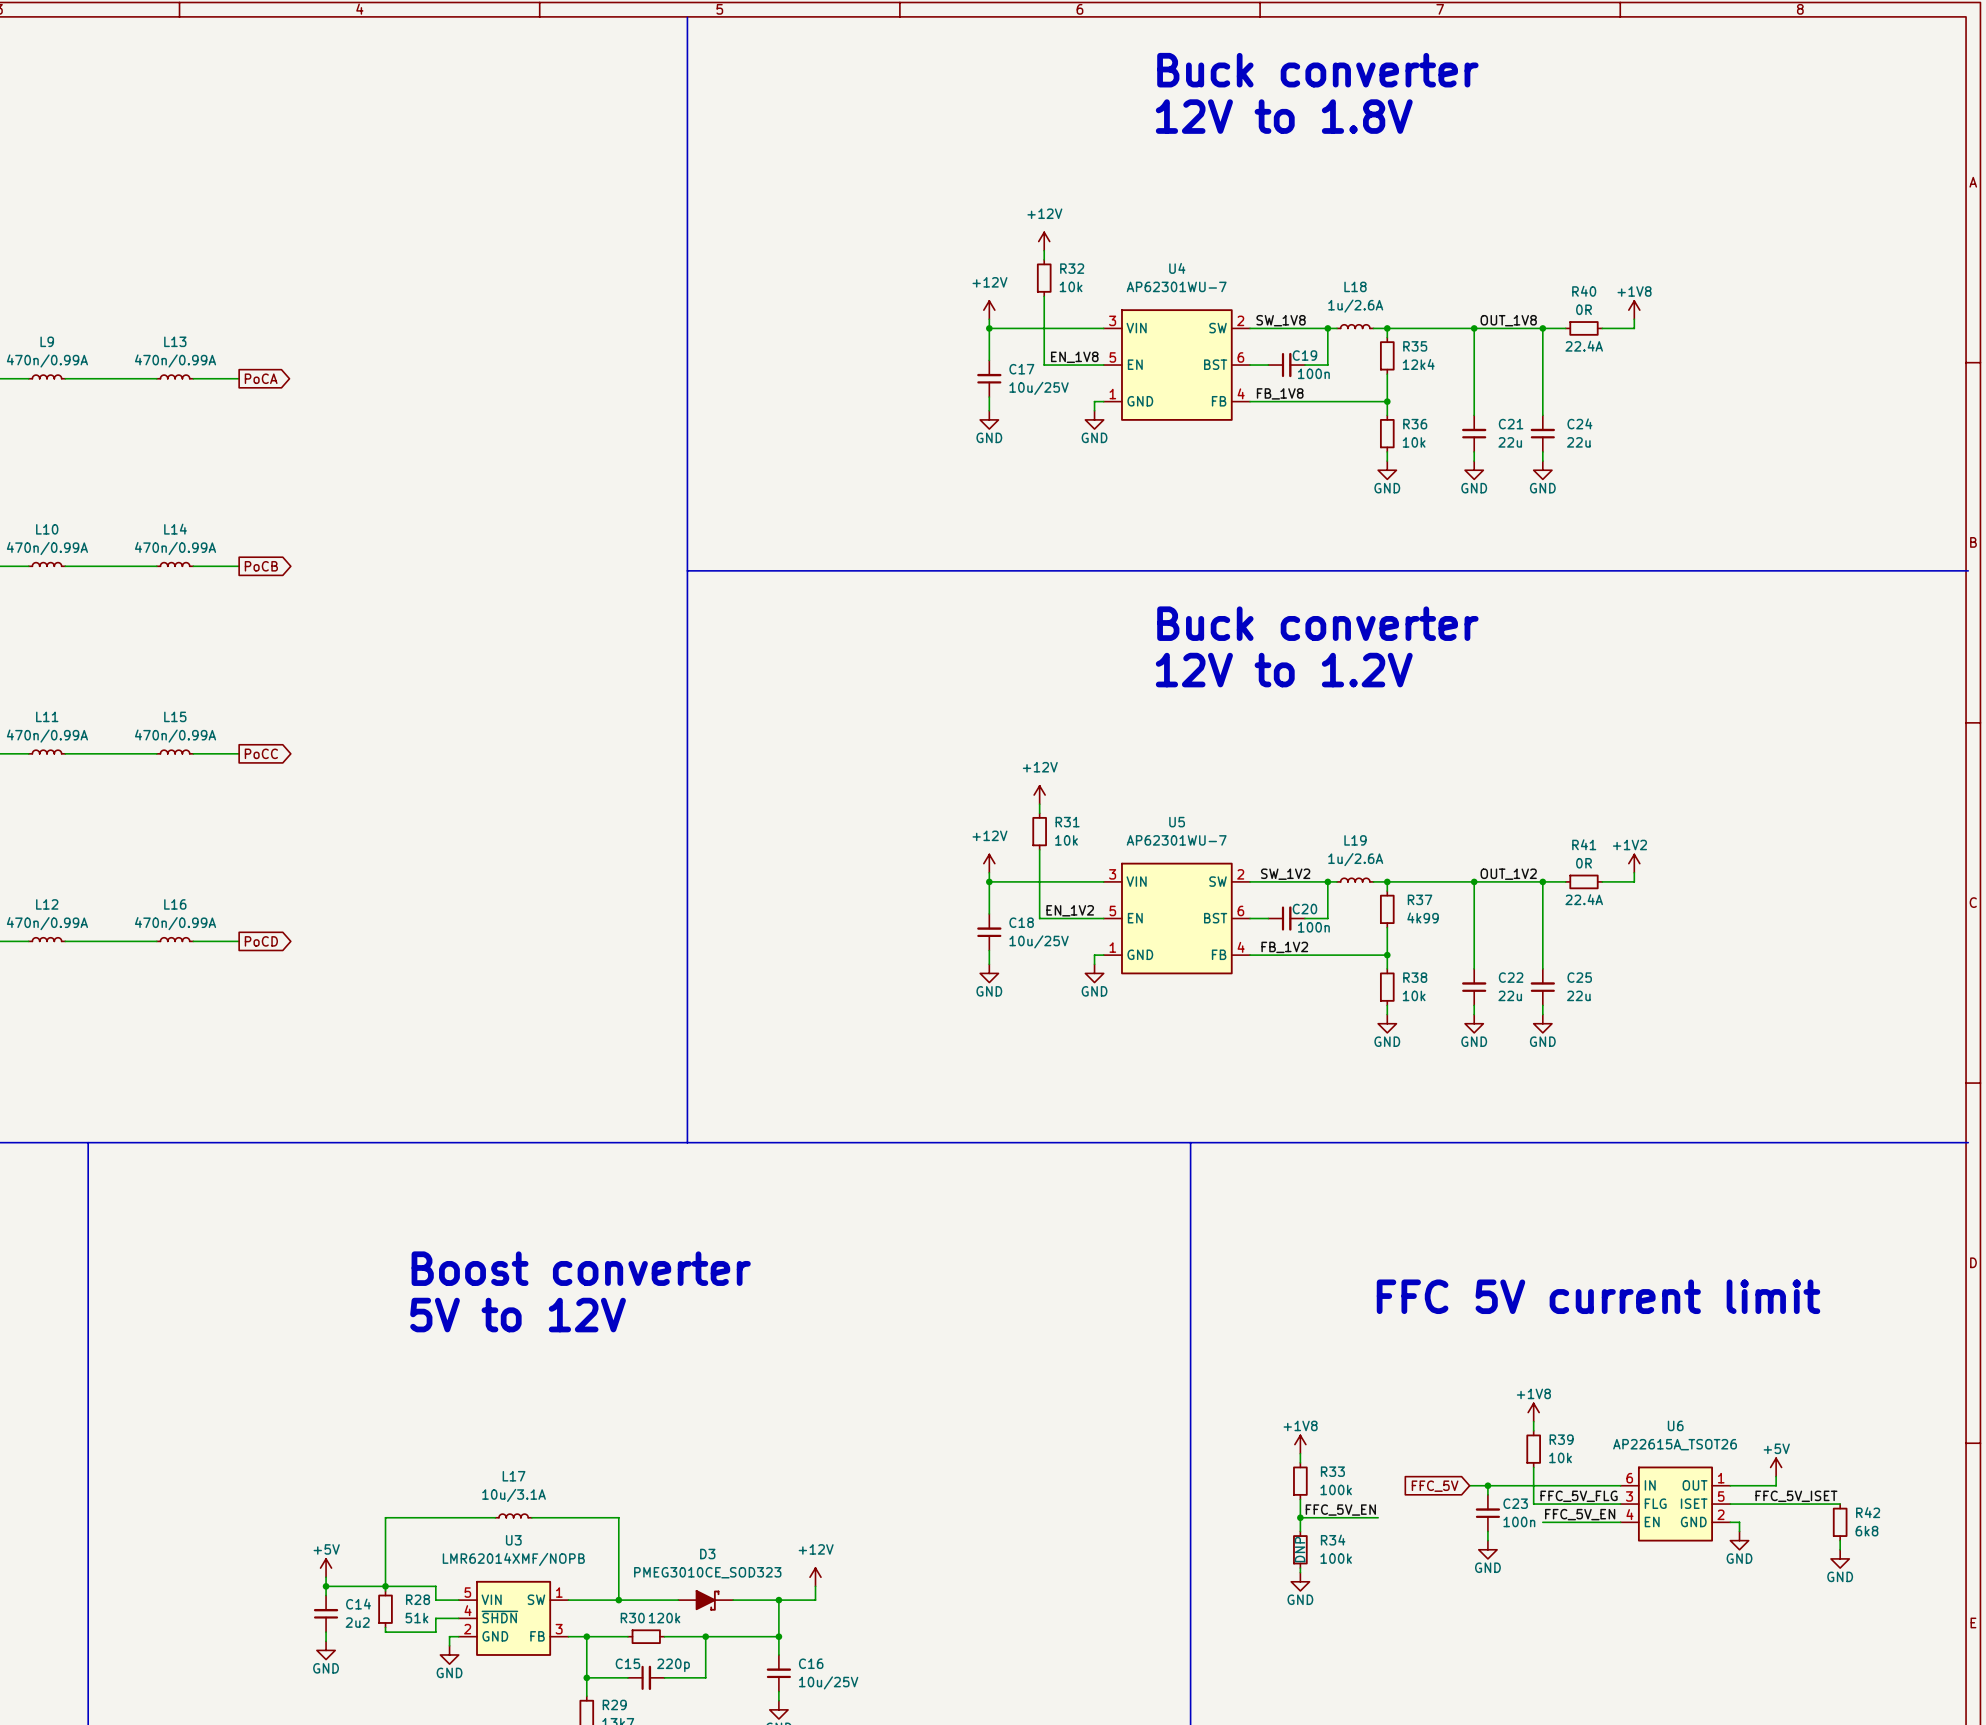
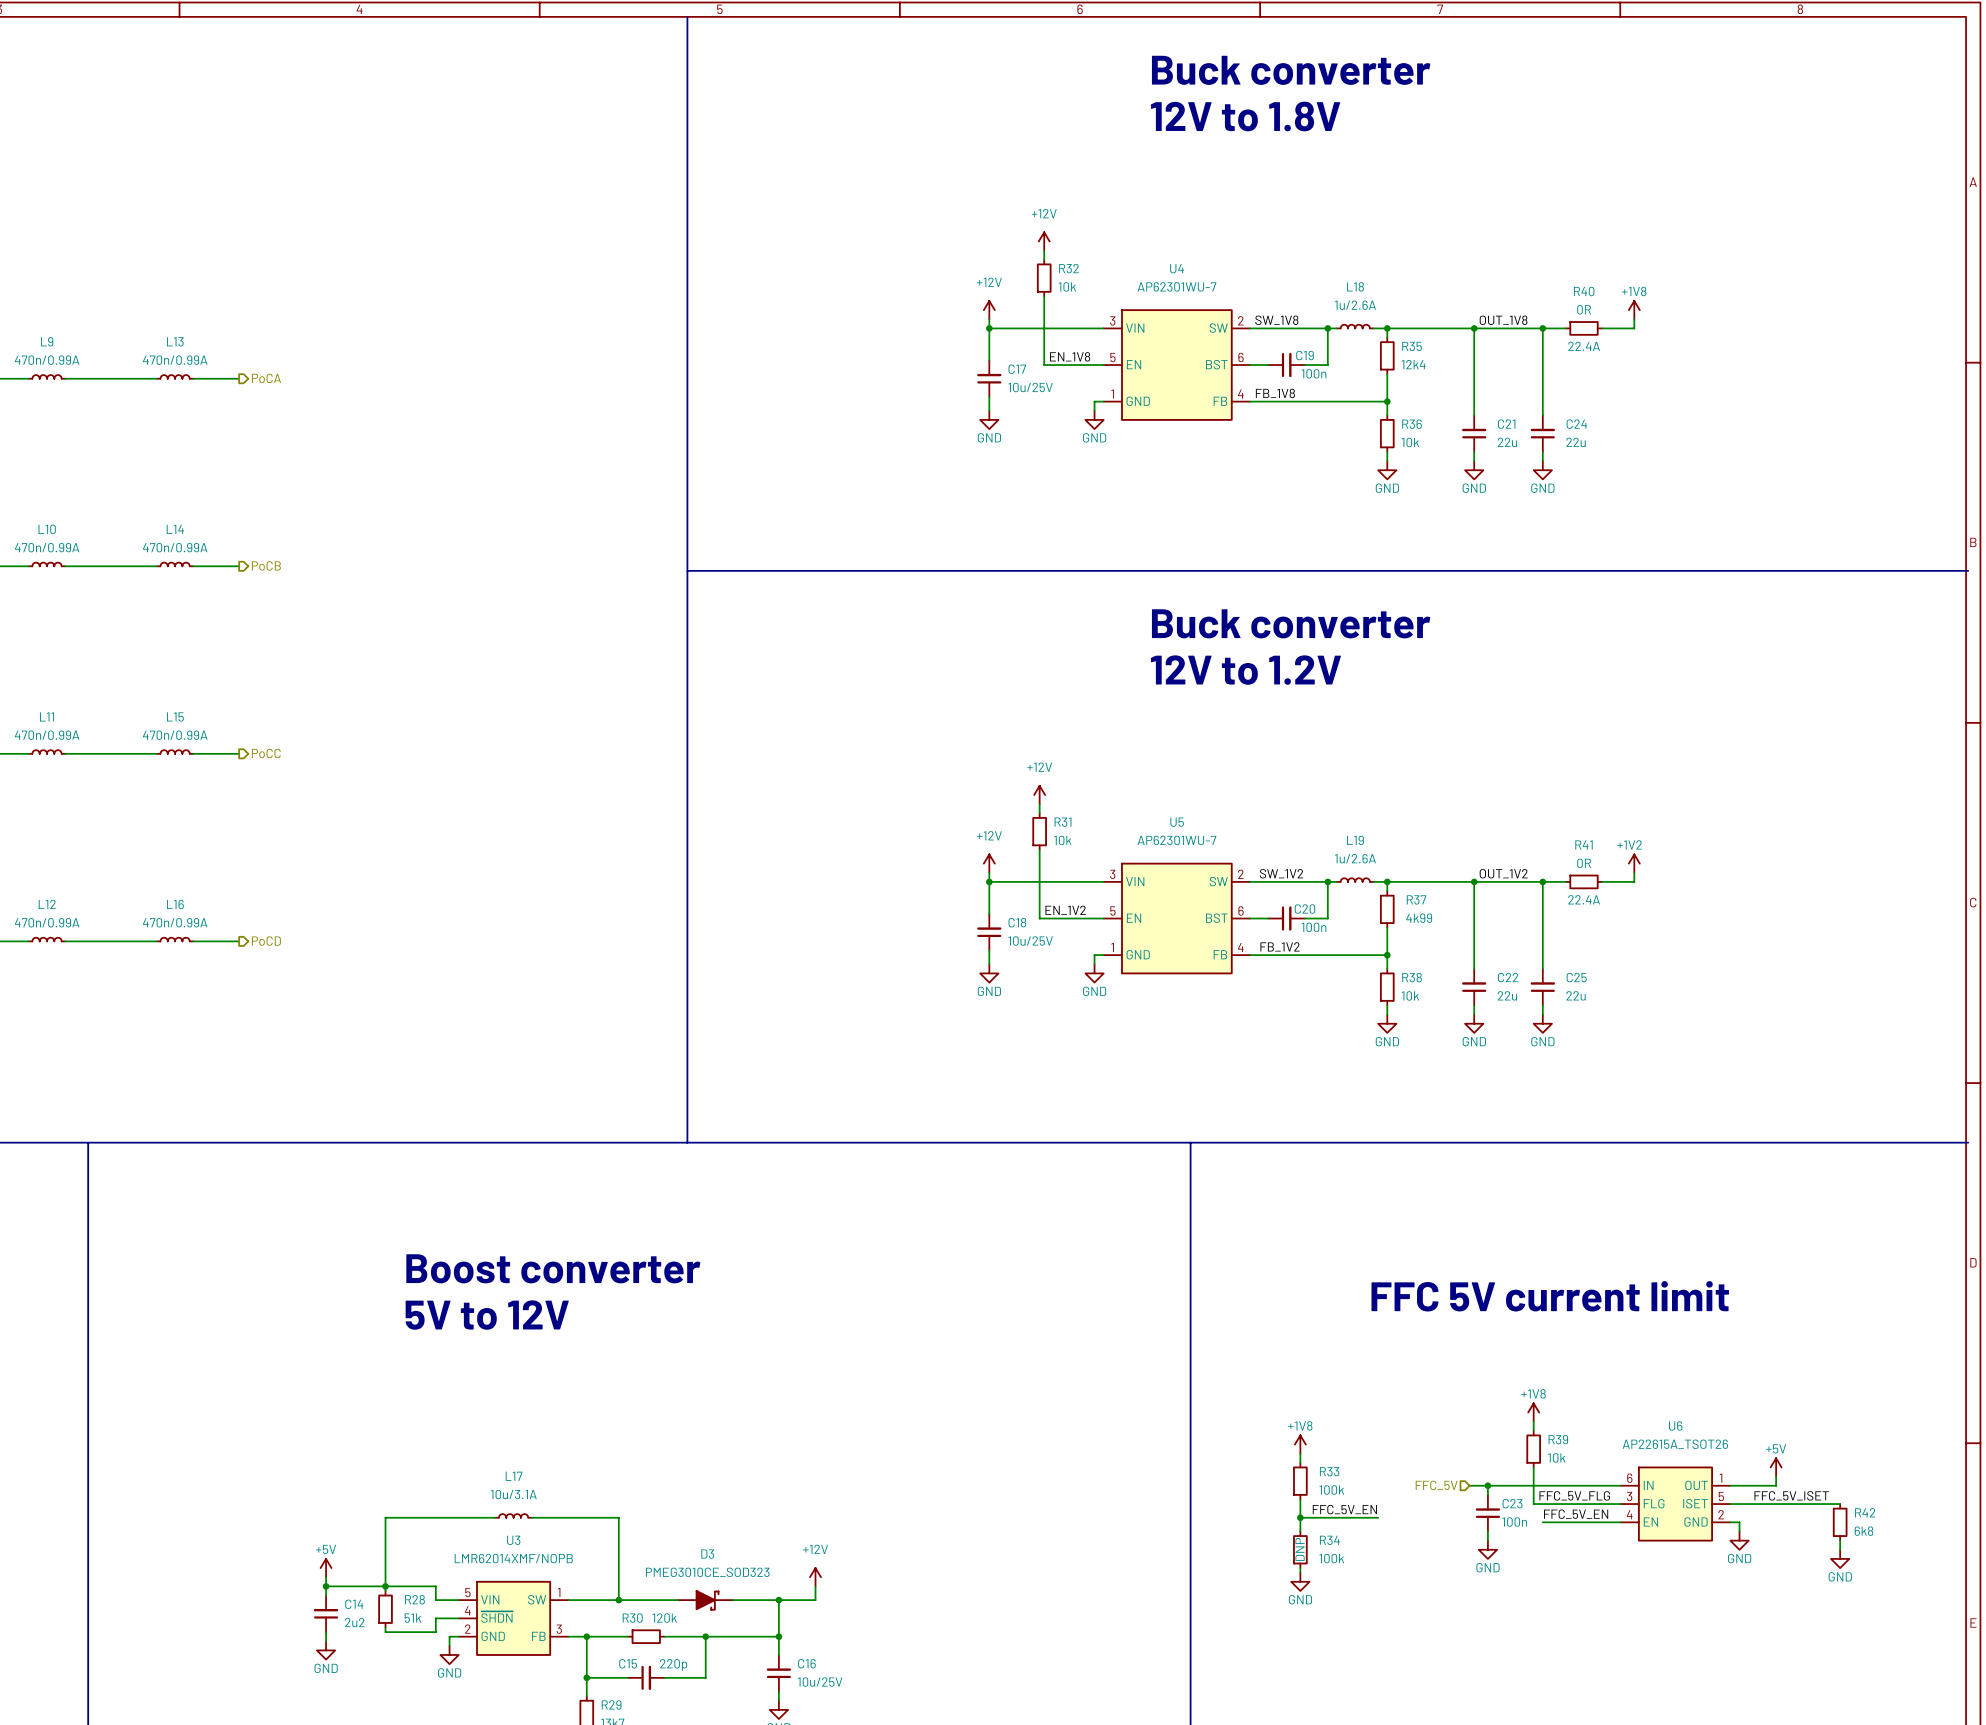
global label: PoCA (261, 378) -> none
hierarchical label: none -> PoCA (266, 378)
hierarchical label: none -> PoCB (266, 565)
global label: PoCB (261, 566) -> none
global label: PoCC (261, 753) -> none
hierarchical label: none -> PoCC (266, 753)
global label: PoCD (261, 941) -> none
hierarchical label: none -> PoCD (266, 941)
hierarchical label: none -> FFC_5V (1436, 1485)
global label: FFC_5V (1435, 1486) -> none

